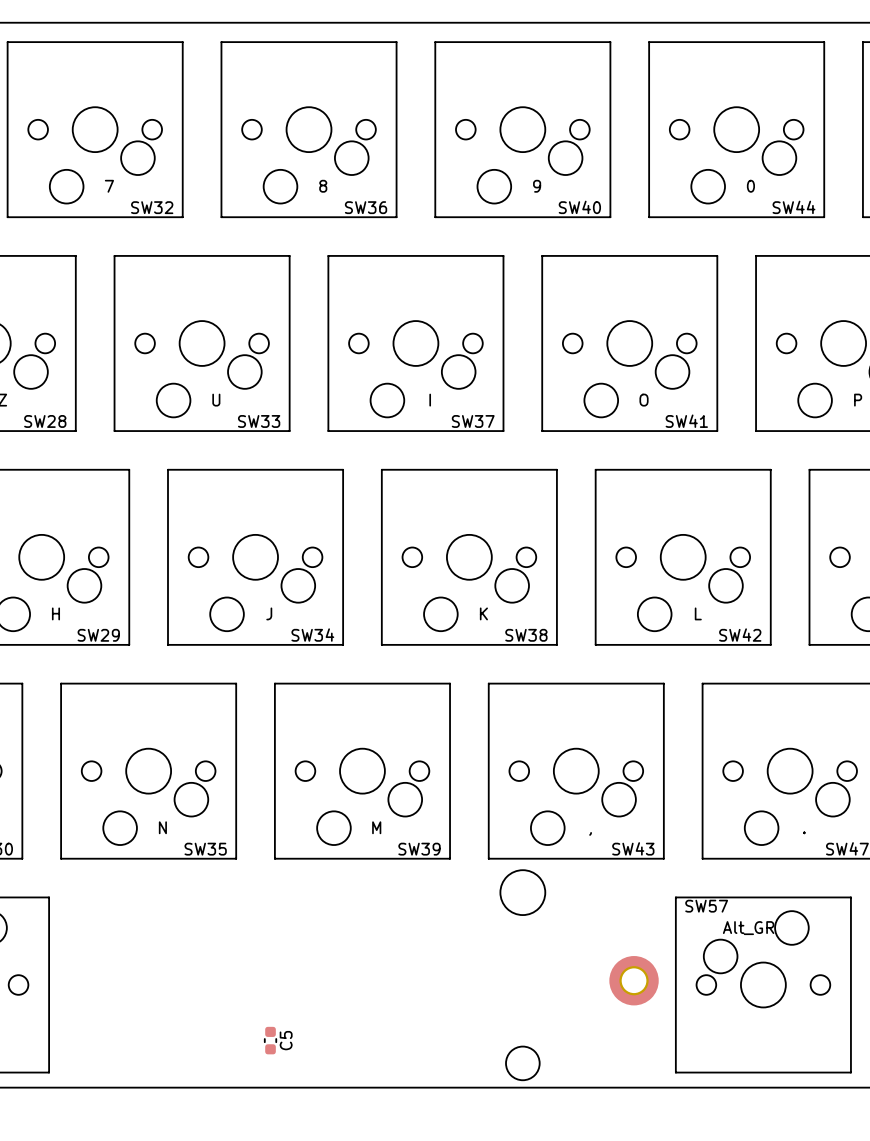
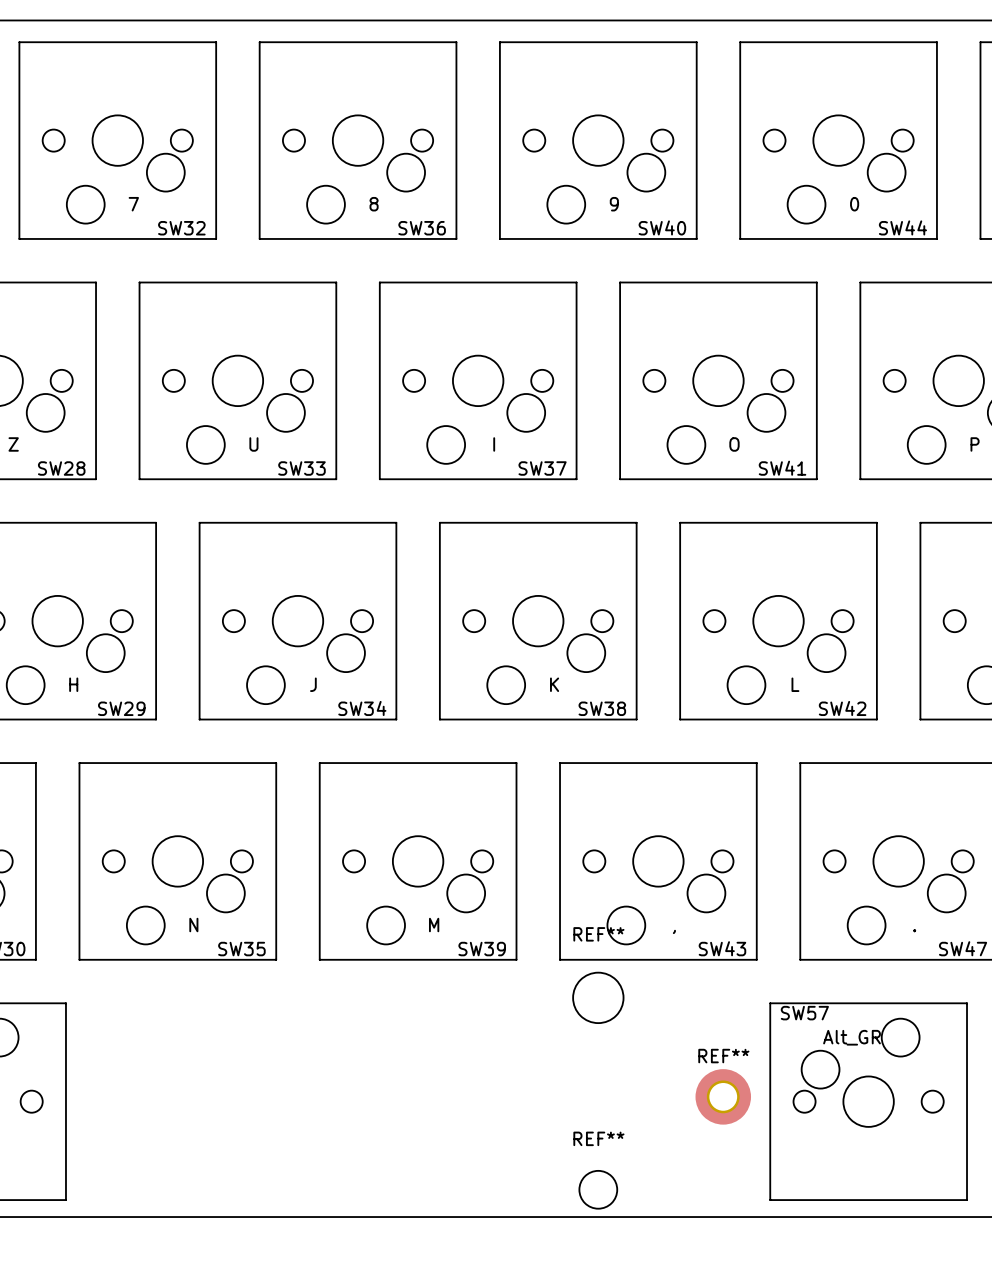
REF** name: none -> REF** (598, 934)
REF** name: none -> REF** (723, 1056)
REF** name: none -> REF** (598, 1138)
C5: (270, 1040) -> none

